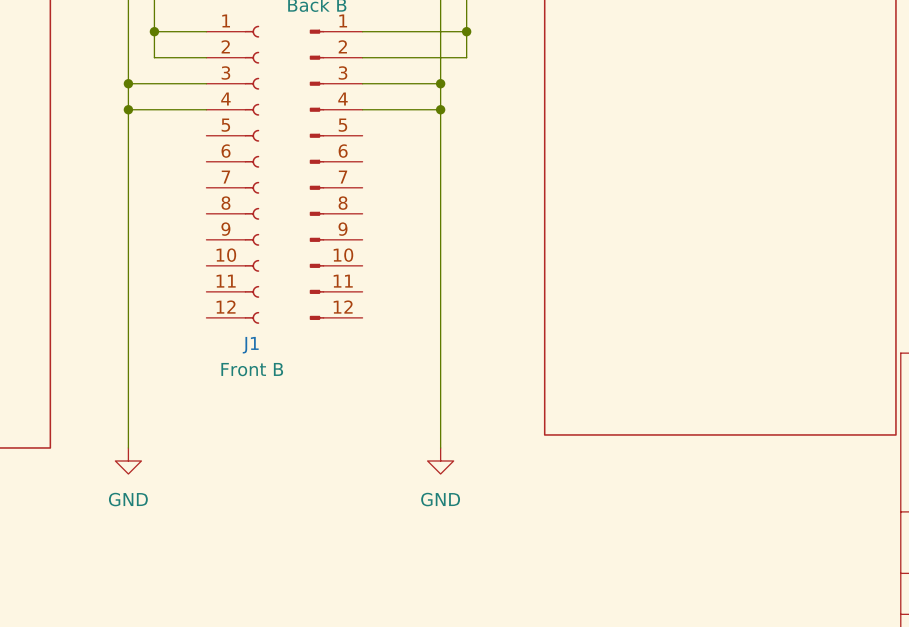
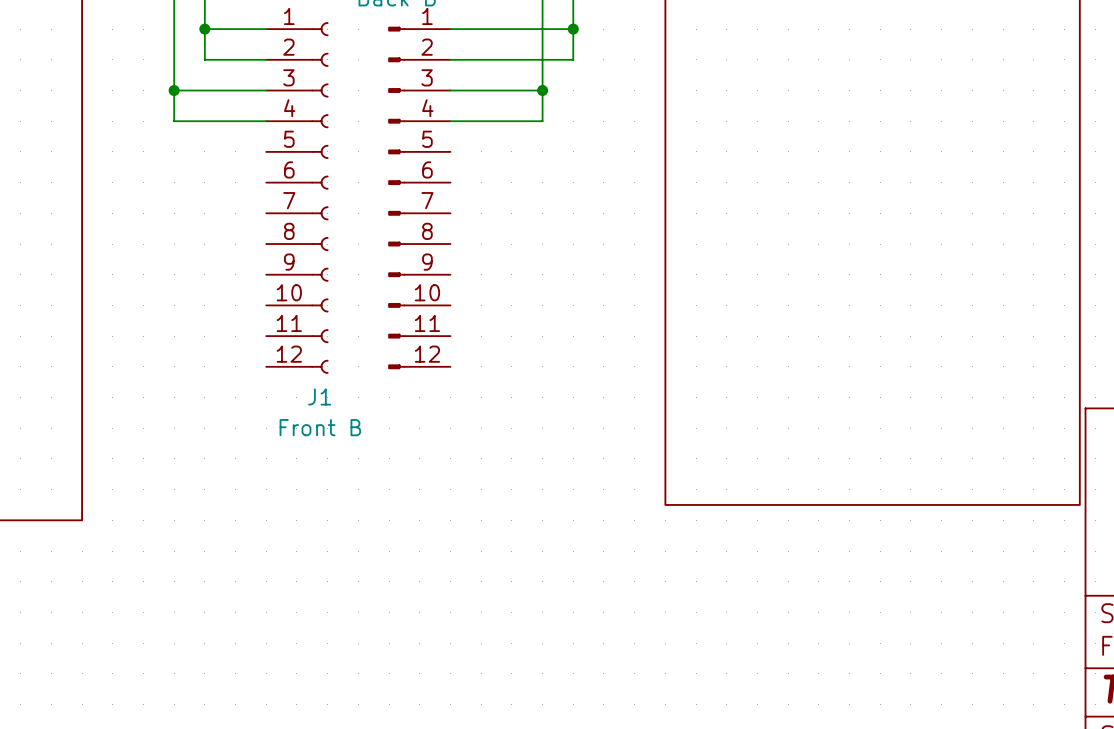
wire: (128, 109) (128, 447) -> none
junction: (128, 109) -> none
wire: (440, 109) (440, 447) -> none
junction: (440, 109) -> none
power symbol: GND (128, 461) -> none
power symbol: GND (440, 461) -> none

